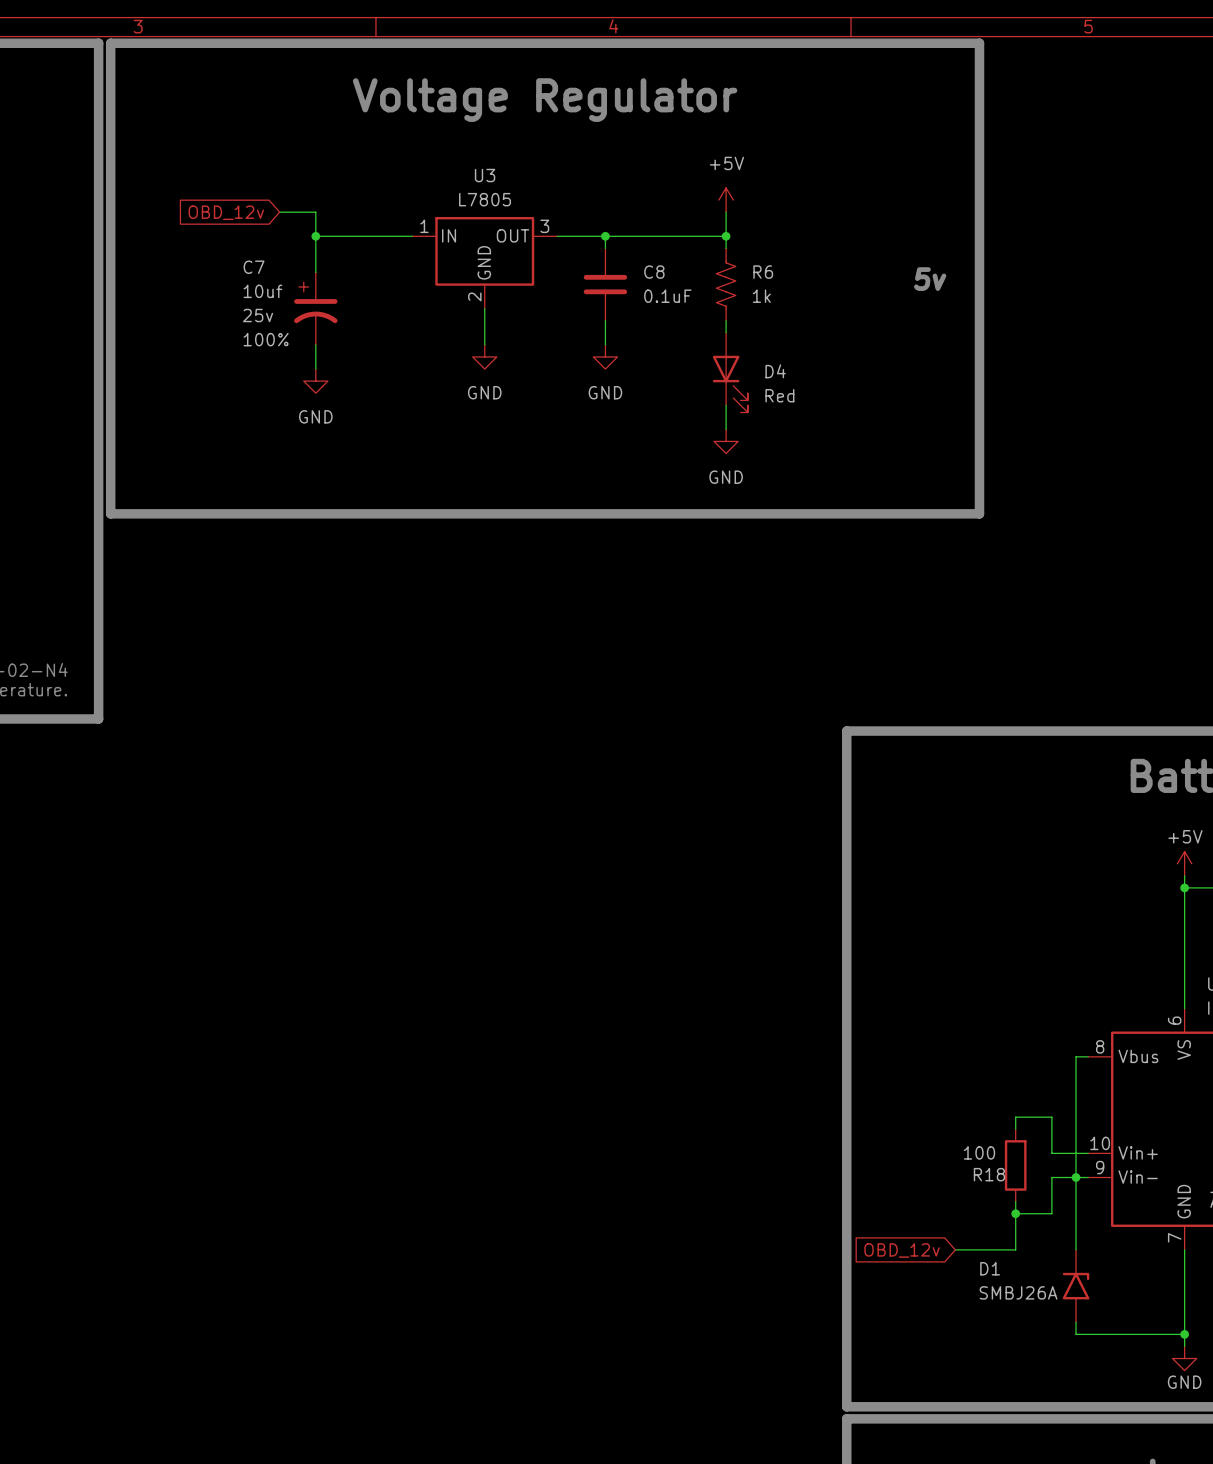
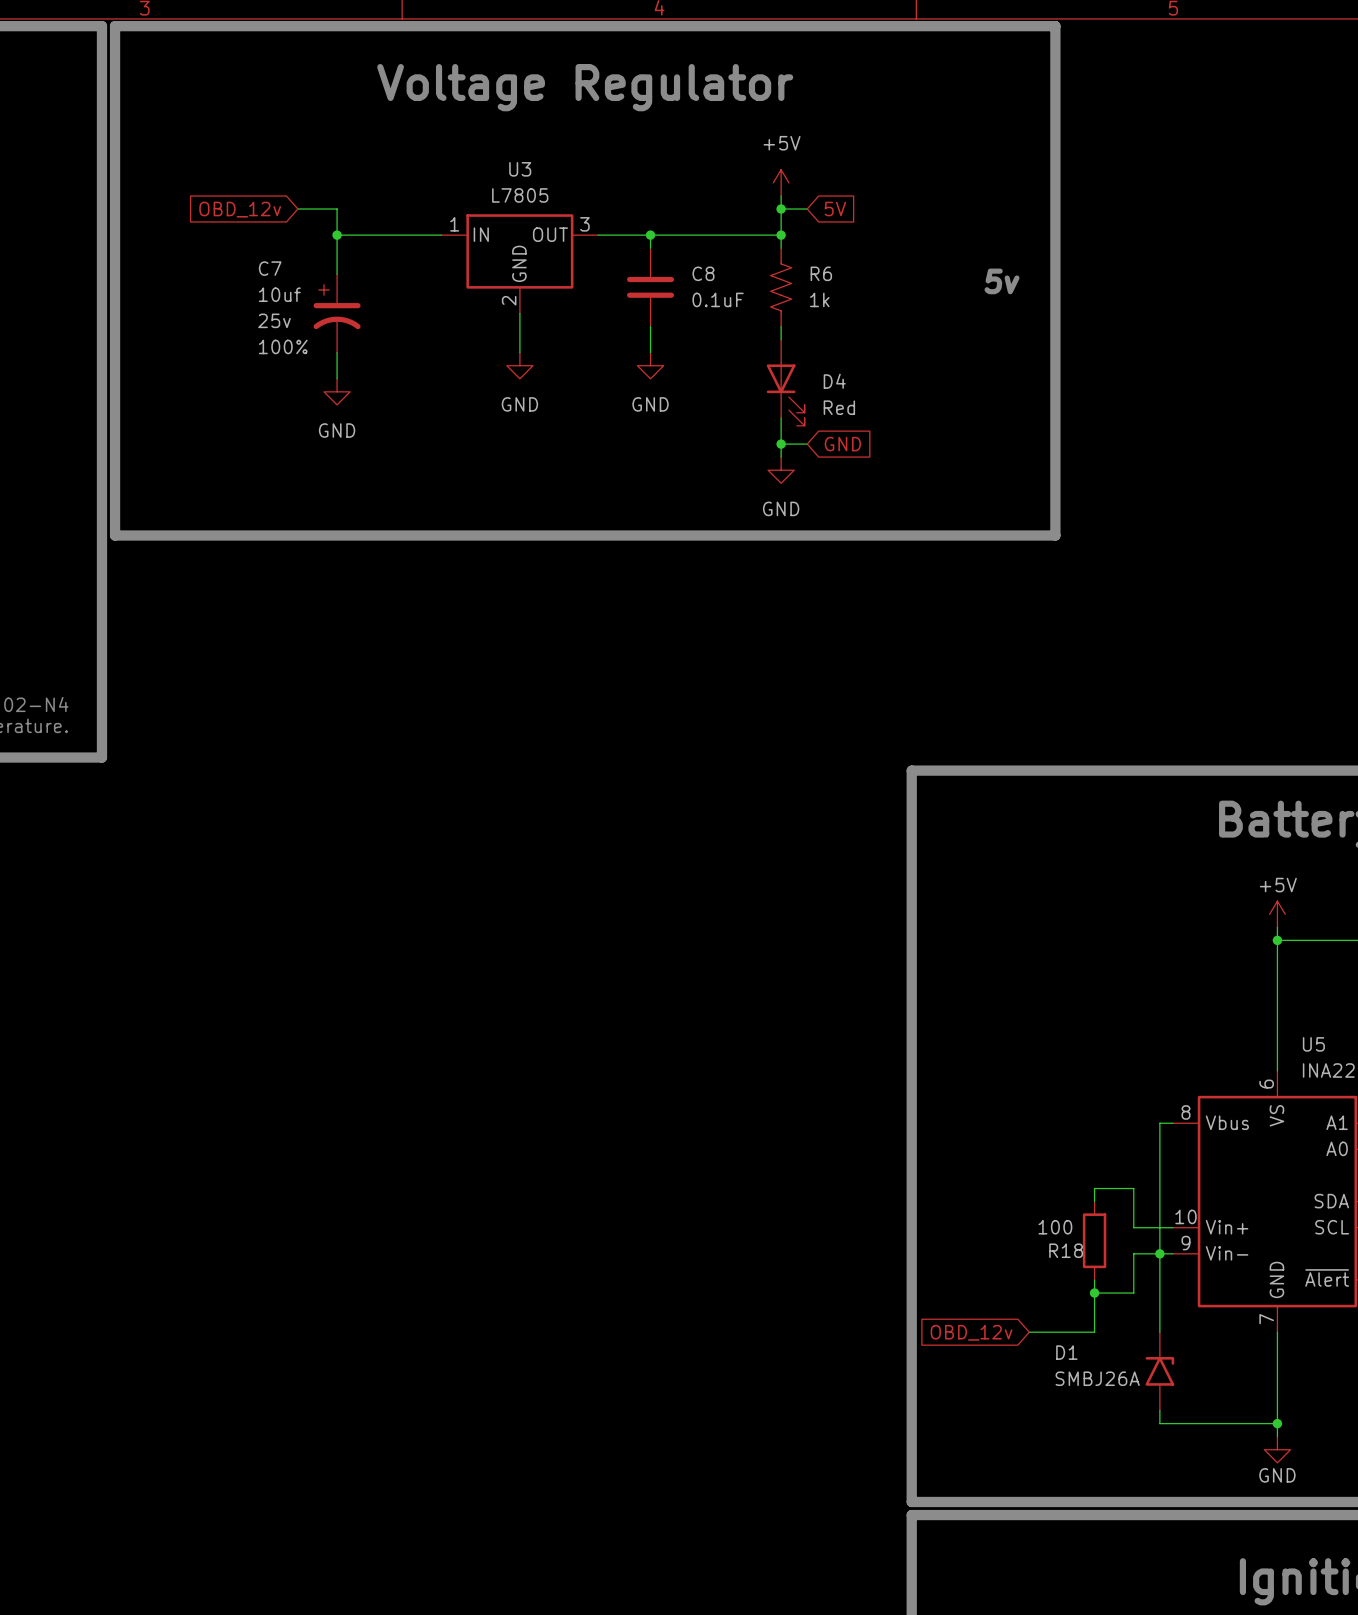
wire: none -> (781, 195) (781, 209) (807, 209)
power symbol position: +5V (726, 200) -> +5V (781, 182)
junction: none -> (781, 209)
global label: none -> 5V (835, 209)
junction: none -> (781, 444)
wire: none -> (807, 444) (781, 444) (781, 457)
global label: none -> GND (842, 444)
power symbol position: GND (726, 441) -> GND (781, 470)

